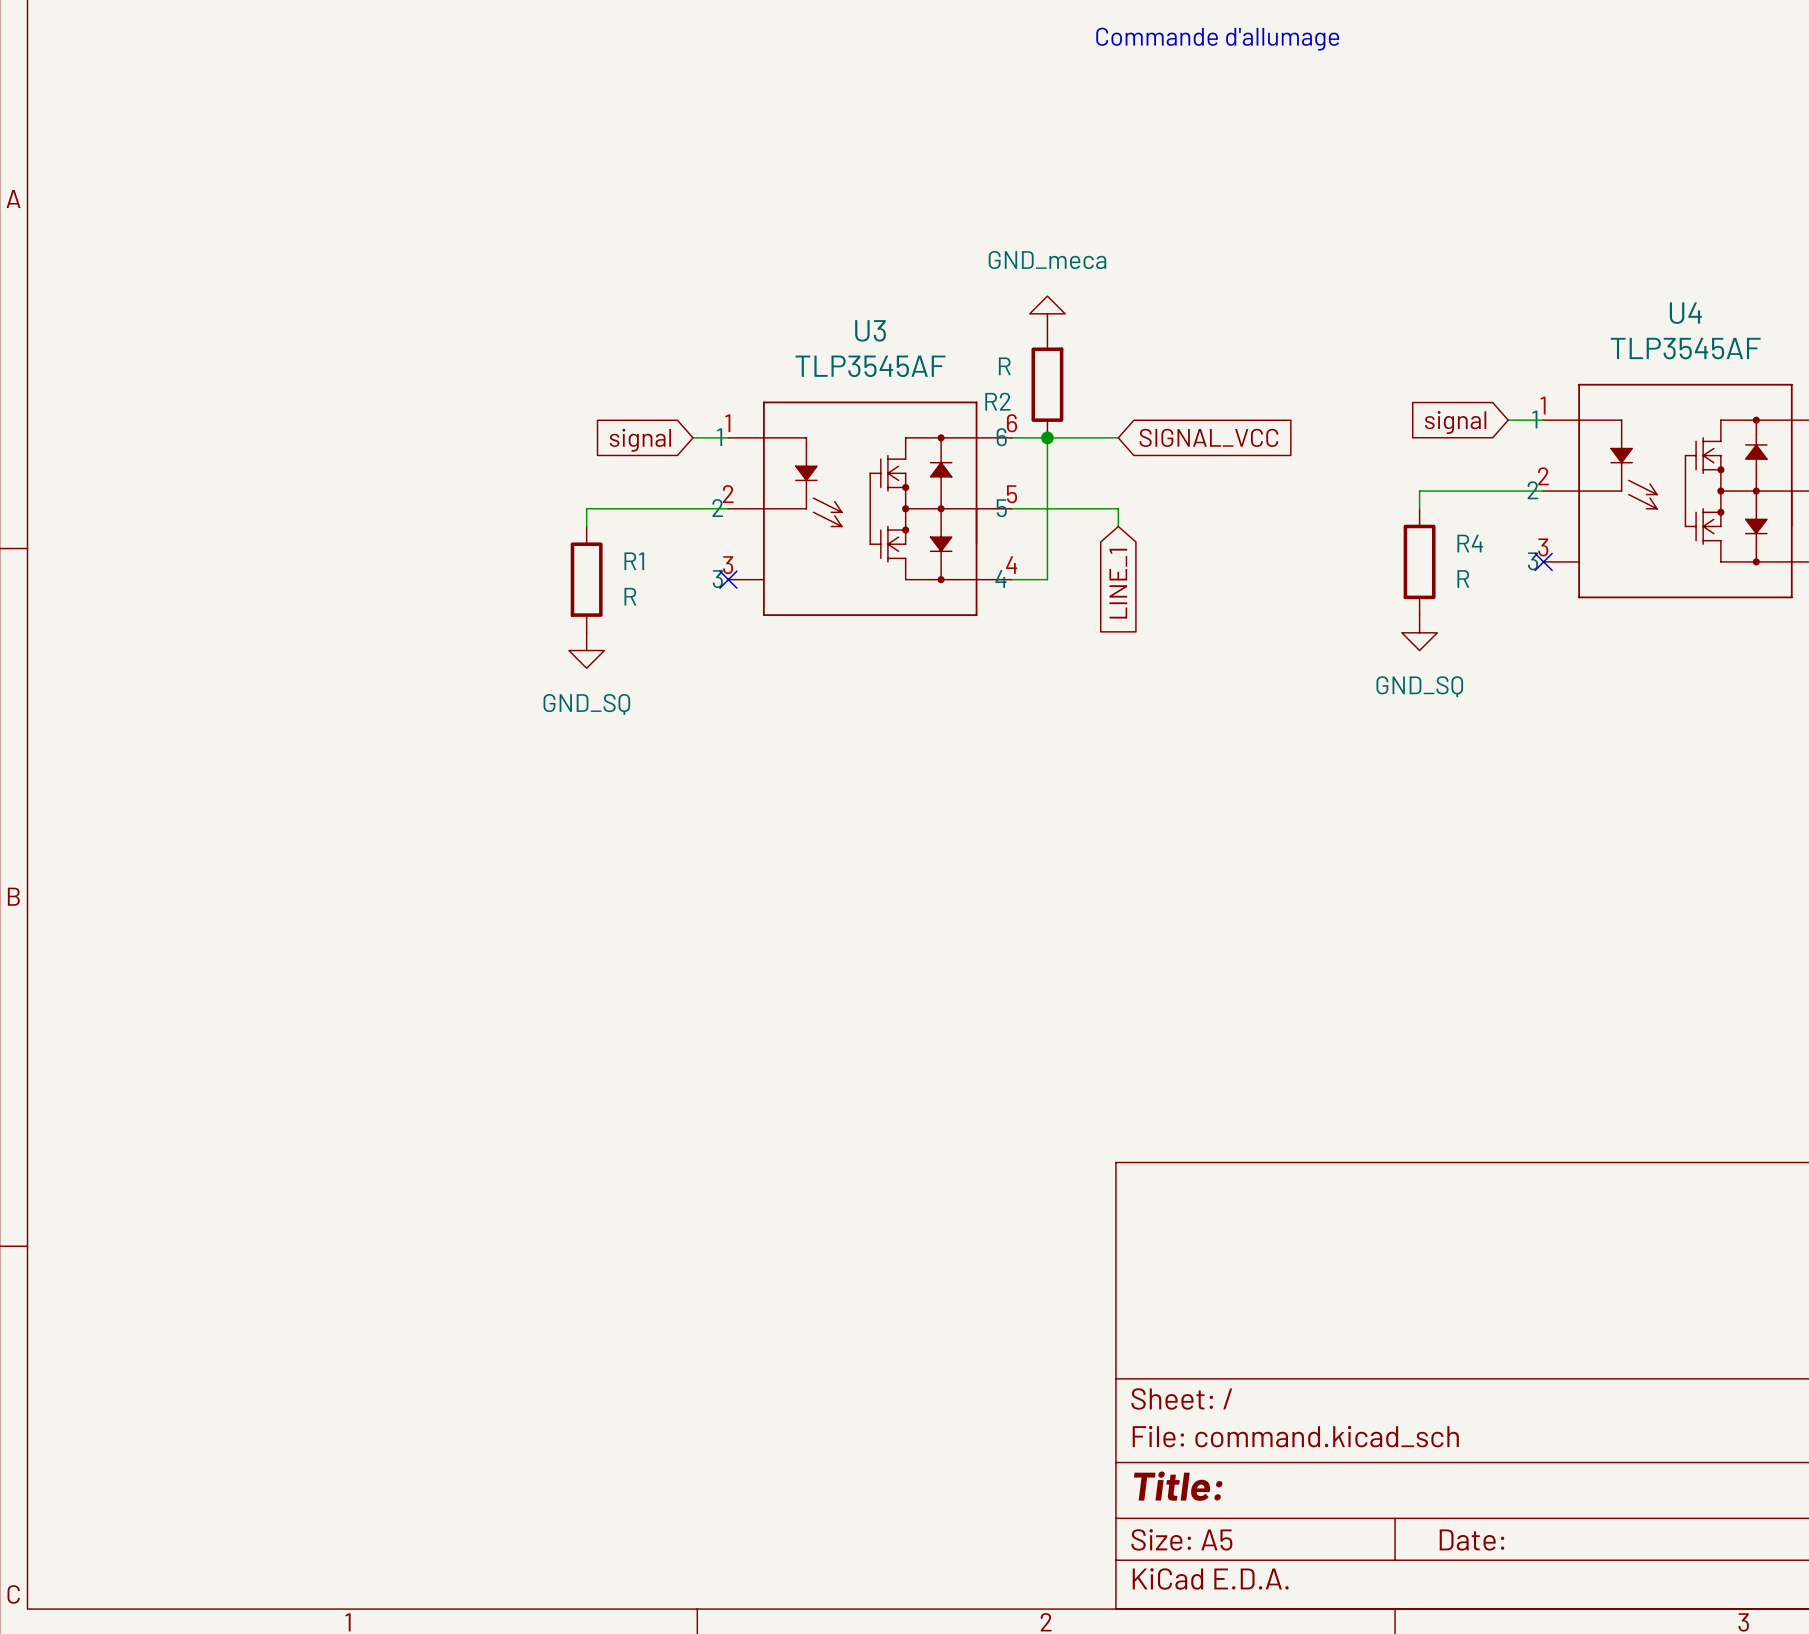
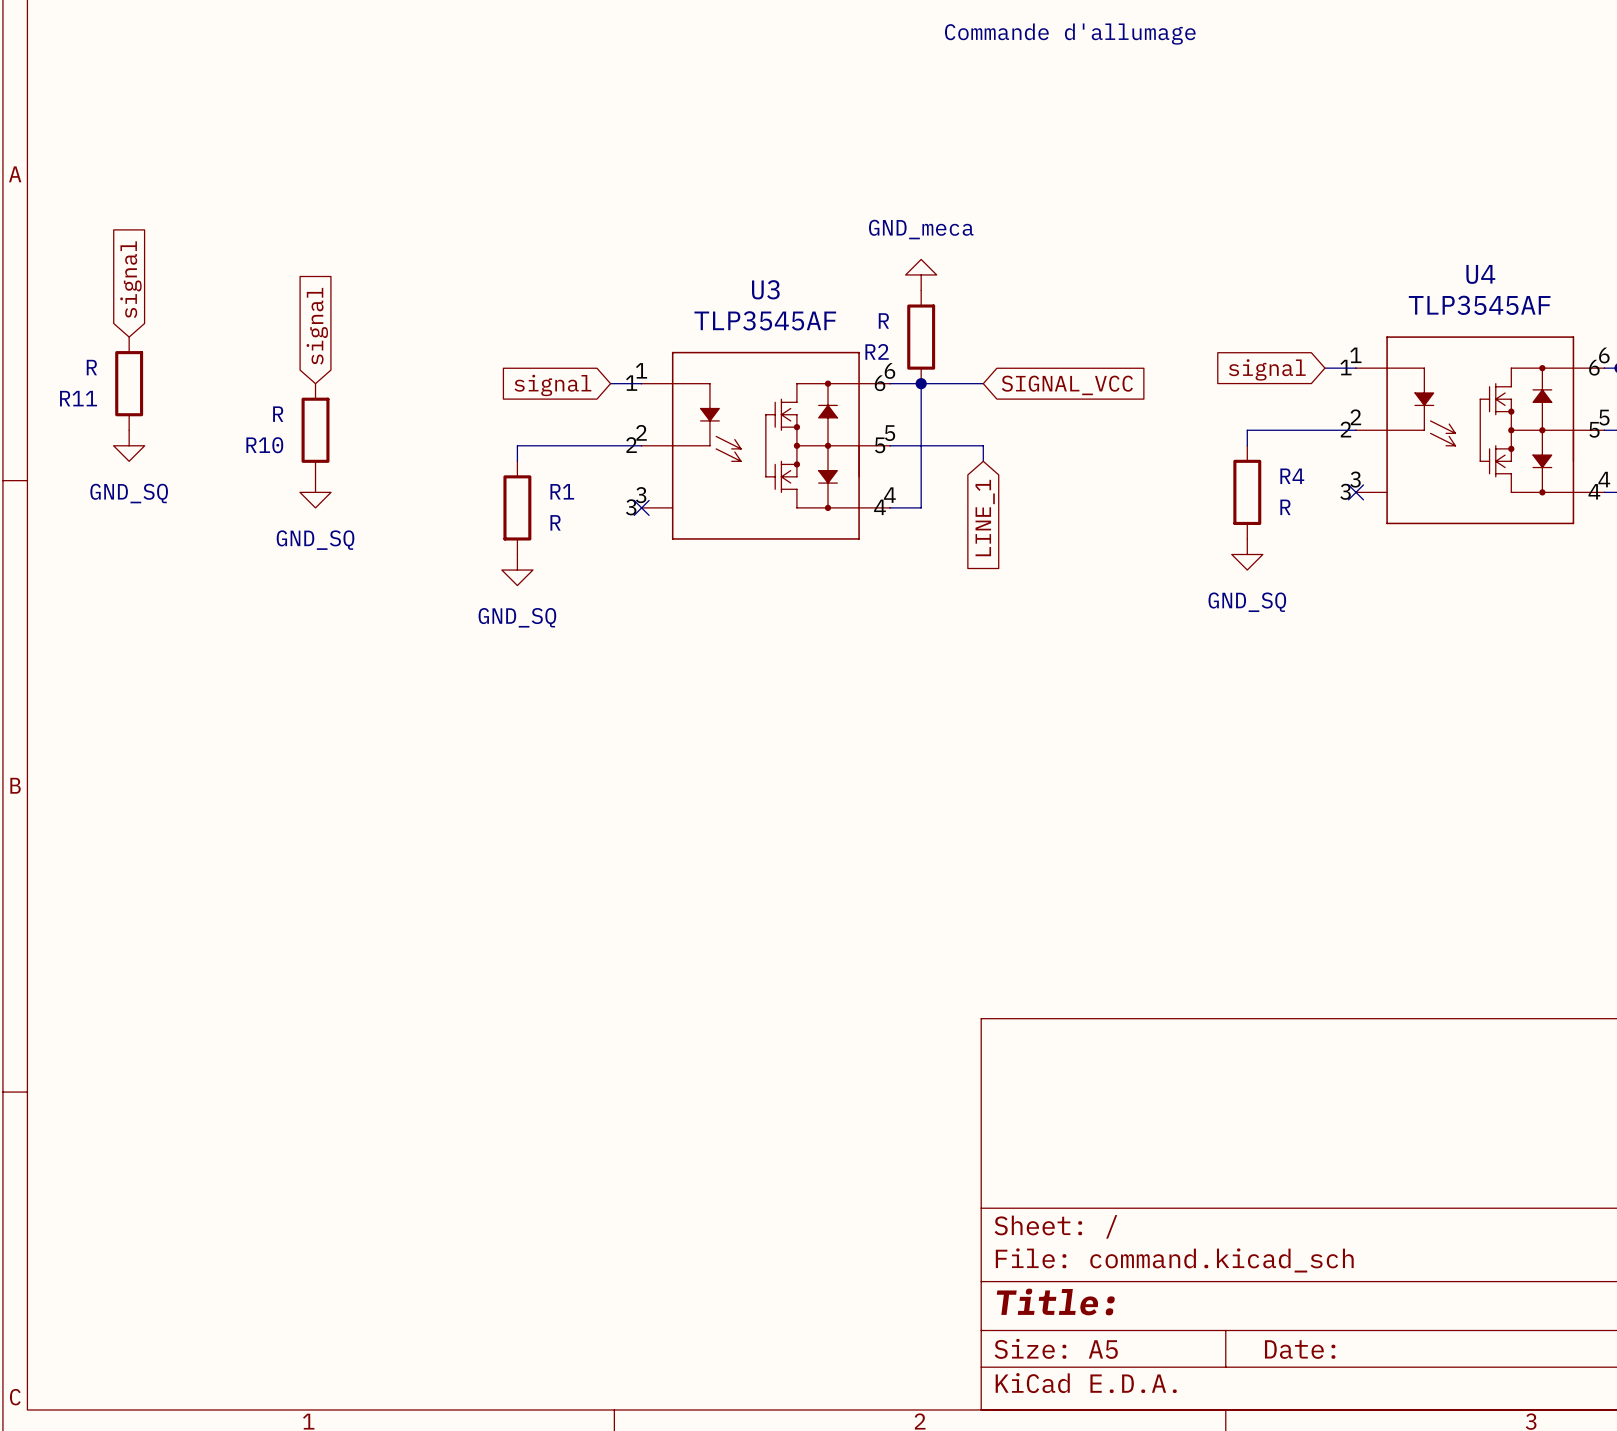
global label: none -> signal (130, 279)
global label: none -> signal (317, 326)
R11: none -> R (129, 383)
R10: none -> R (315, 430)
power symbol: none -> GND_SQ (129, 445)
power symbol: none -> GND_SQ (315, 492)

